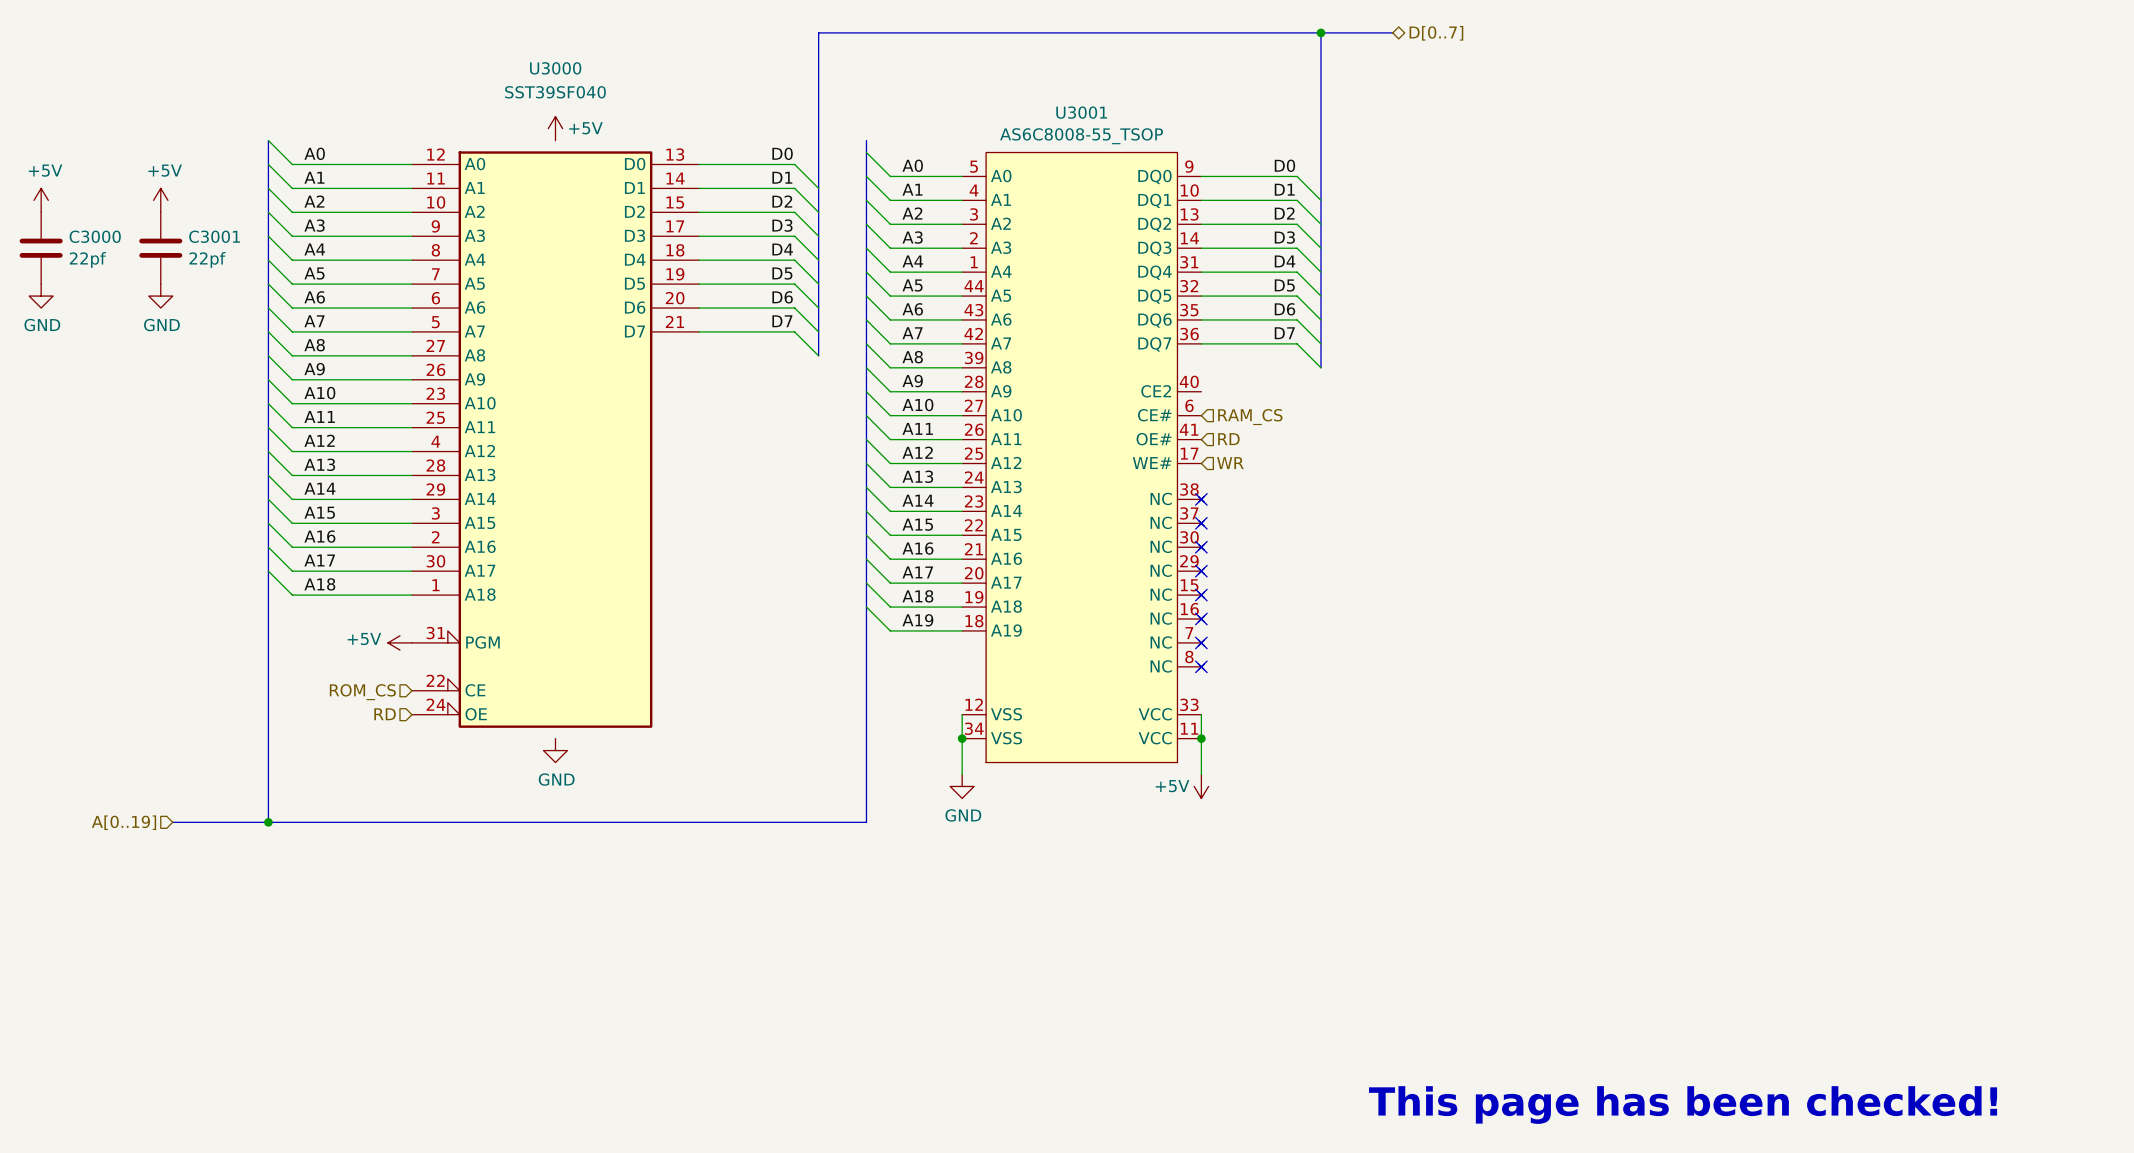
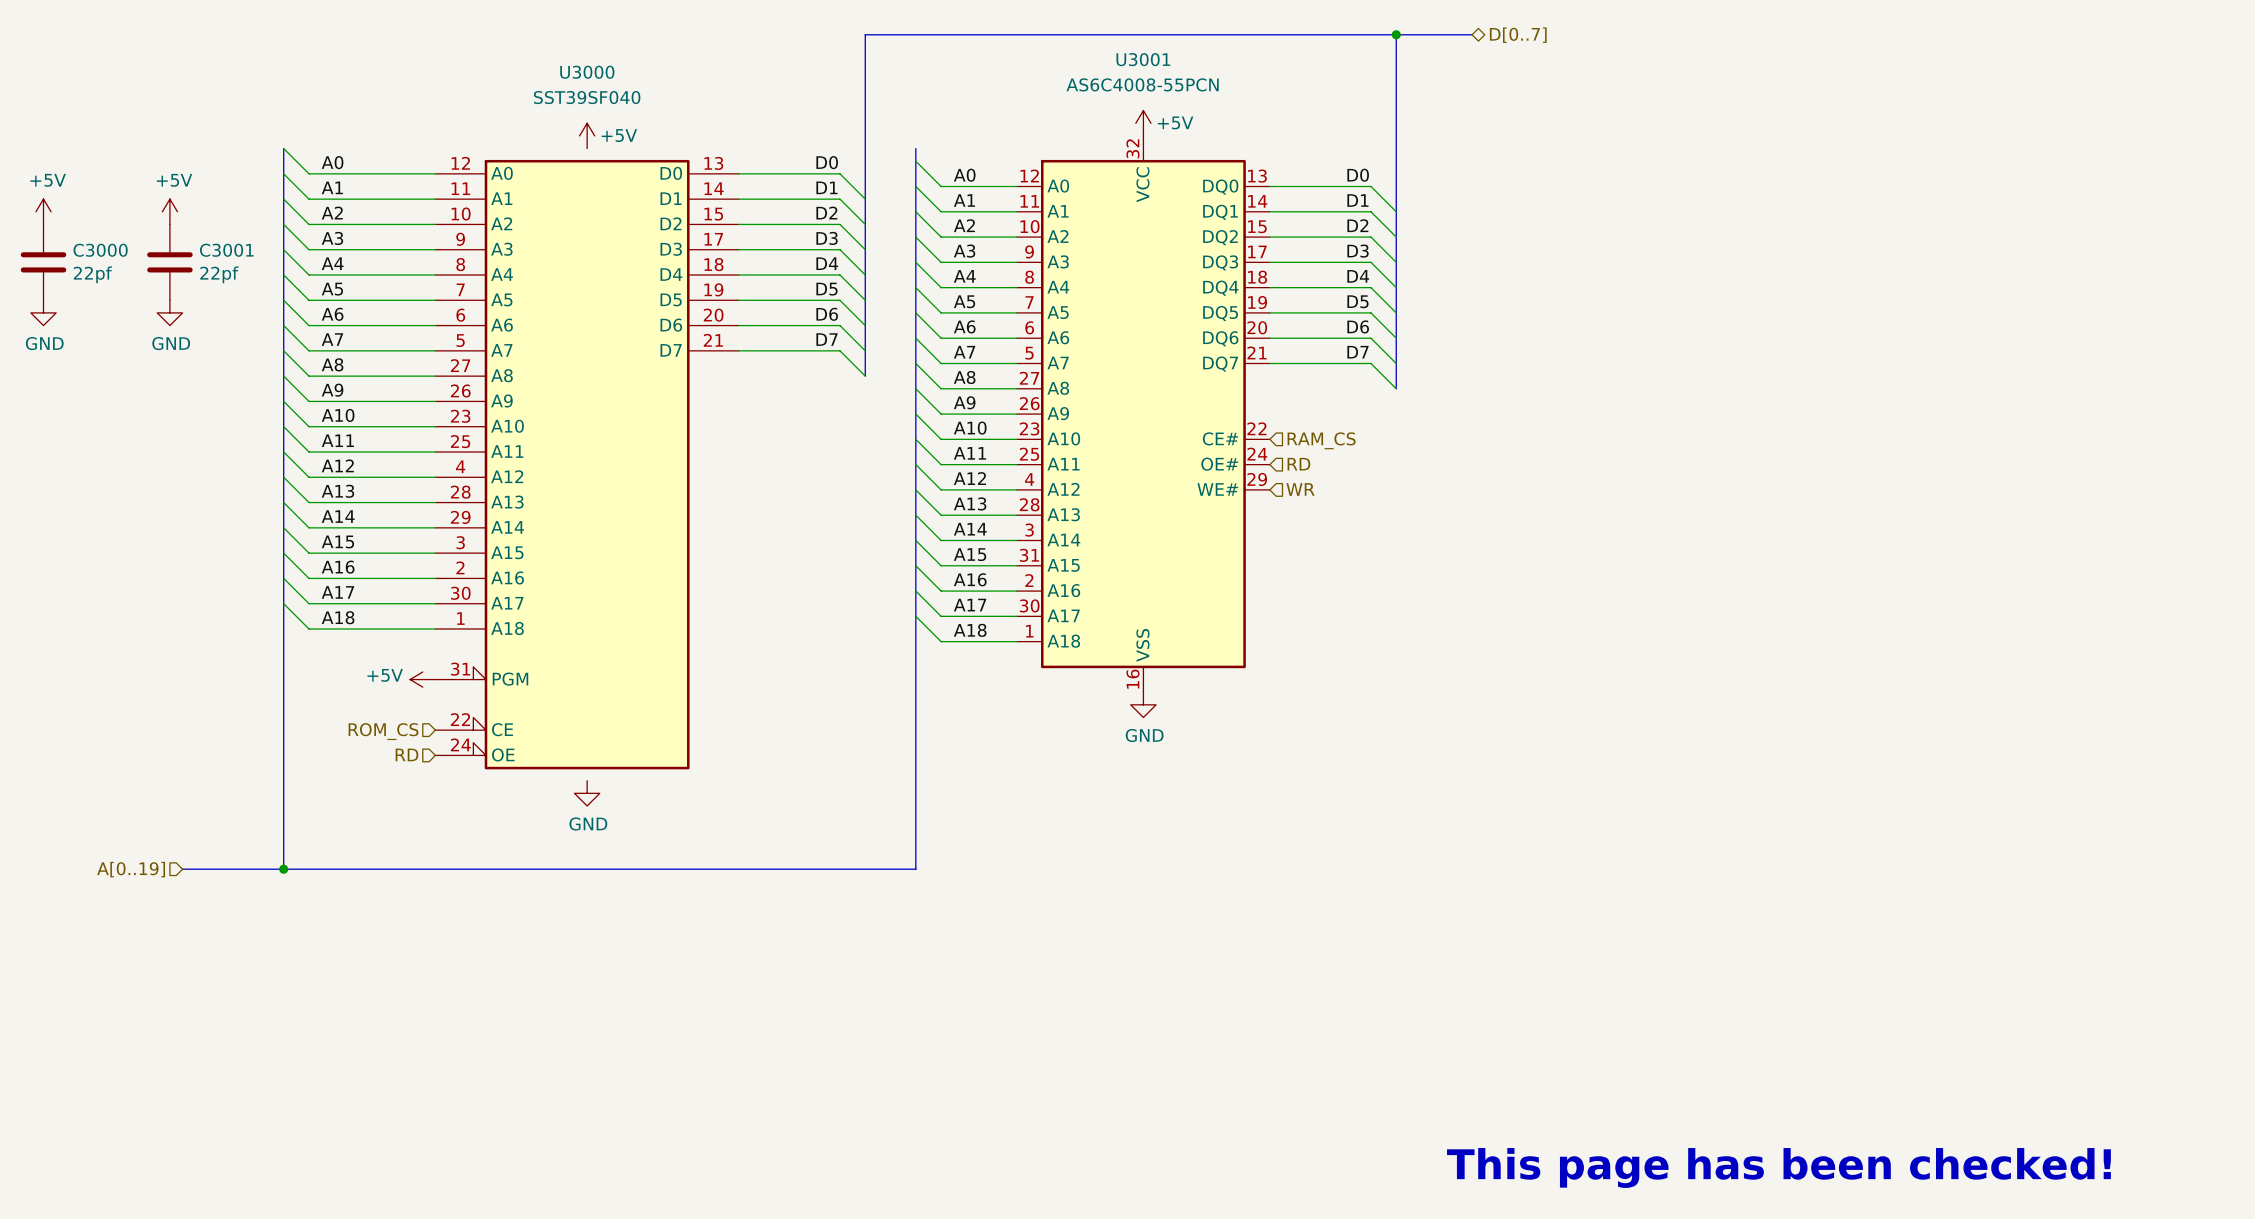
power symbol: none -> +5V (1143, 123)
U3001 value: AS6C8008-55_TSOP (1081, 136) -> AS6C4008-55PCN (1142, 84)
U3001 symbol: [962, 152, 1205, 763] -> [1016, 135, 1270, 693]
no-connect mark: (1201, 499) -> none
no-connect mark: (1201, 523) -> none
no-connect mark: (1201, 547) -> none
no-connect mark: (1201, 571) -> none
no-connect mark: (1201, 595) -> none
wire: (866, 607) (890, 630) (962, 630) -> none
no-connect mark: (1201, 619) -> none
label: A19 (917, 620) -> none
no-connect mark: (1201, 642) -> none
no-connect mark: (1201, 666) -> none
wire: (962, 714) (962, 774) -> none
wire: (1201, 714) (1201, 774) -> none
junction: (962, 738) -> none
junction: (1201, 738) -> none
power symbol position: GND (962, 786) -> GND (1143, 704)
power symbol: +5V (1201, 786) -> none

